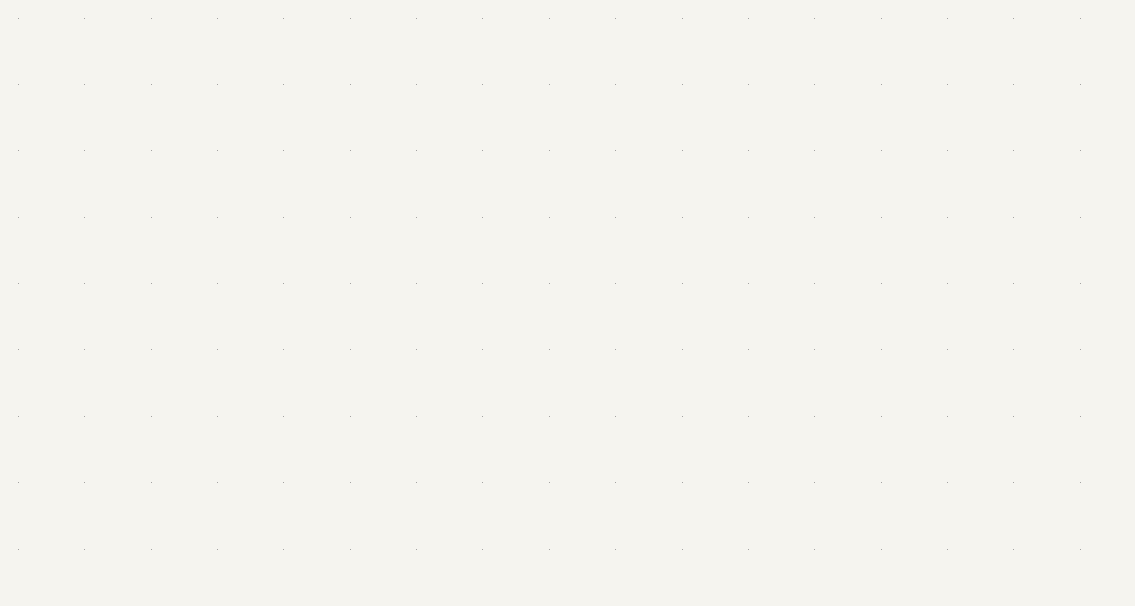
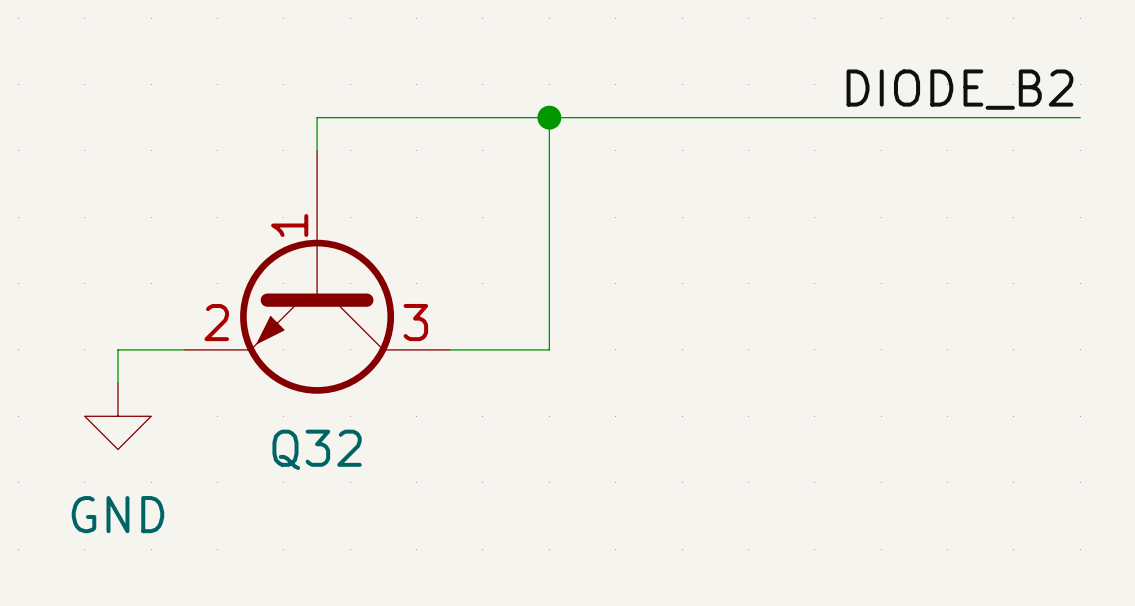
label: none -> DIODE_B2 (959, 89)
wire: none -> (549, 117) (549, 349) (449, 349)
junction: none -> (549, 117)
wire: none -> (1080, 117) (317, 117) (317, 150)
Q32: none -> (317, 272)
wire: none -> (184, 349) (117, 349) (117, 383)
power symbol: none -> GND (117, 416)

